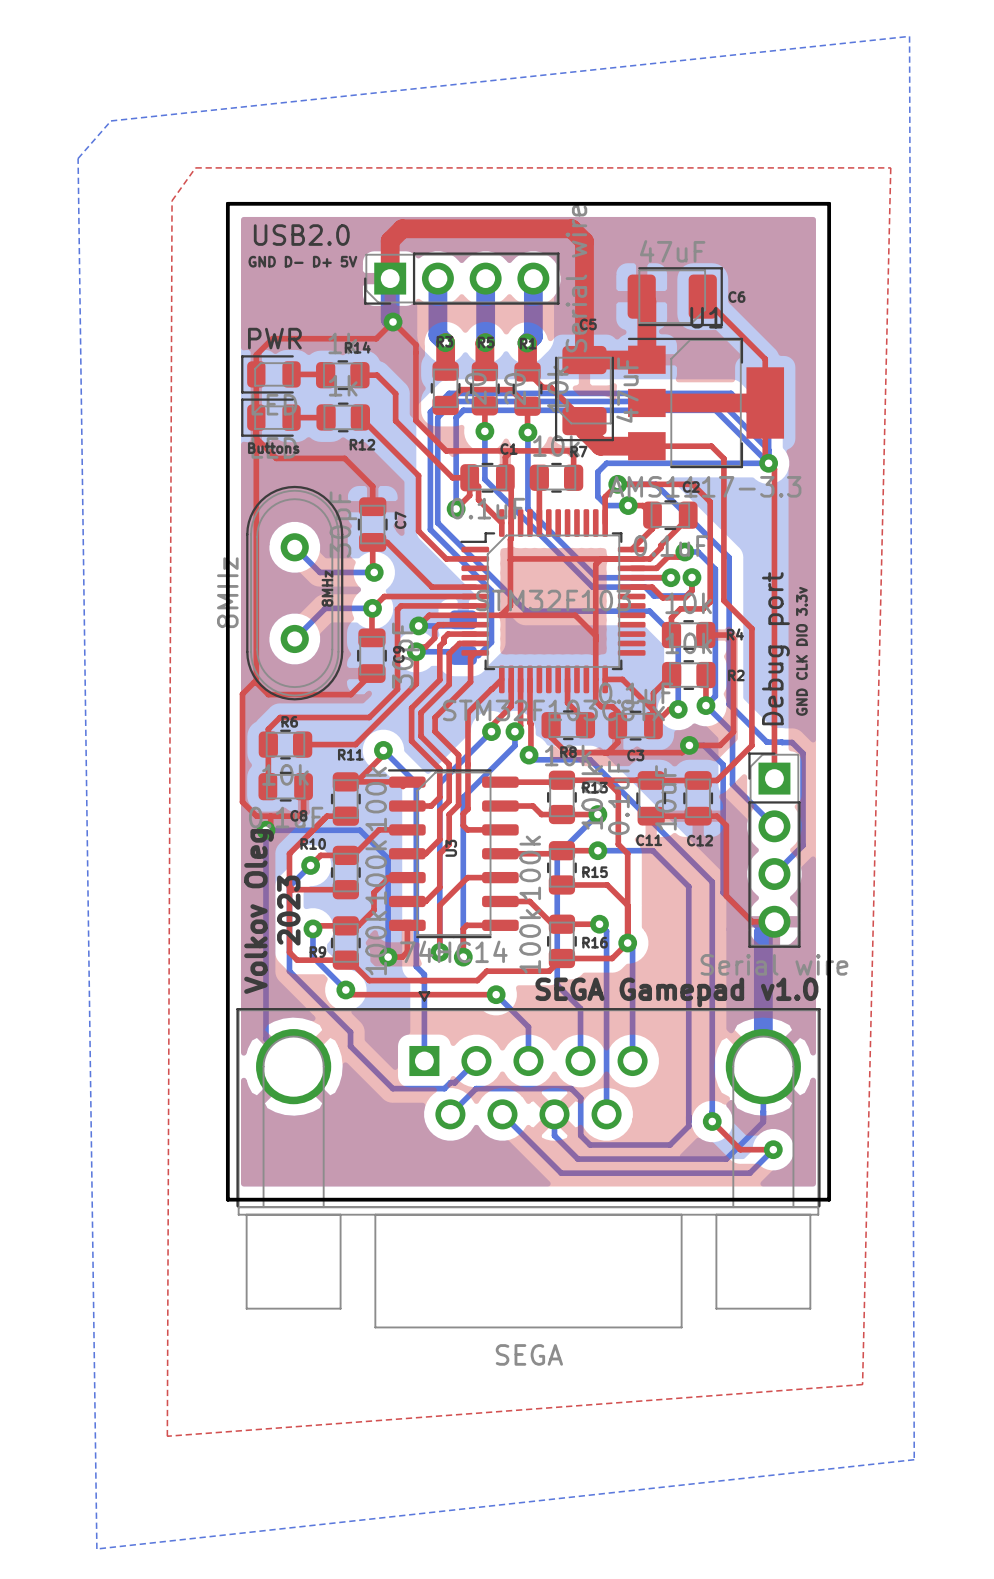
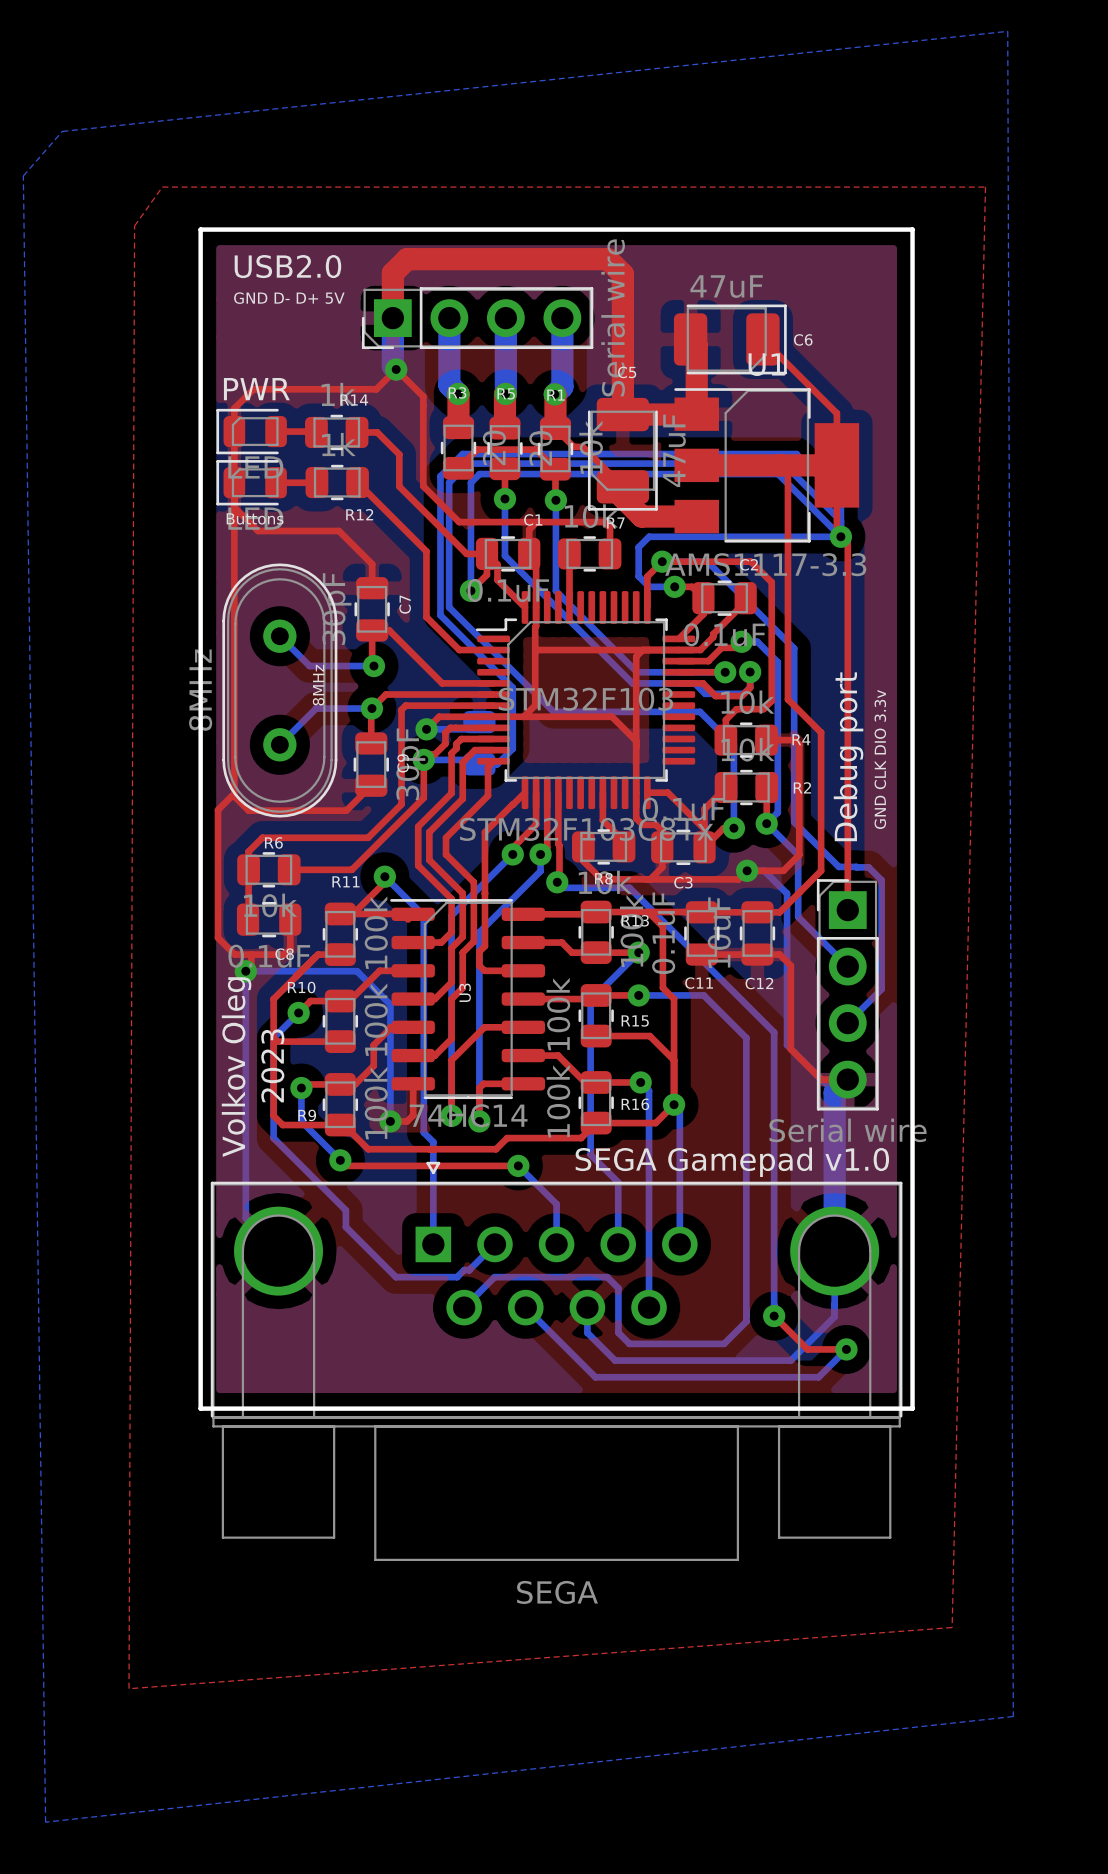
top track: (646, 446) (711, 446) (723, 458) -> (780, 465) (787, 472) (787, 531)

